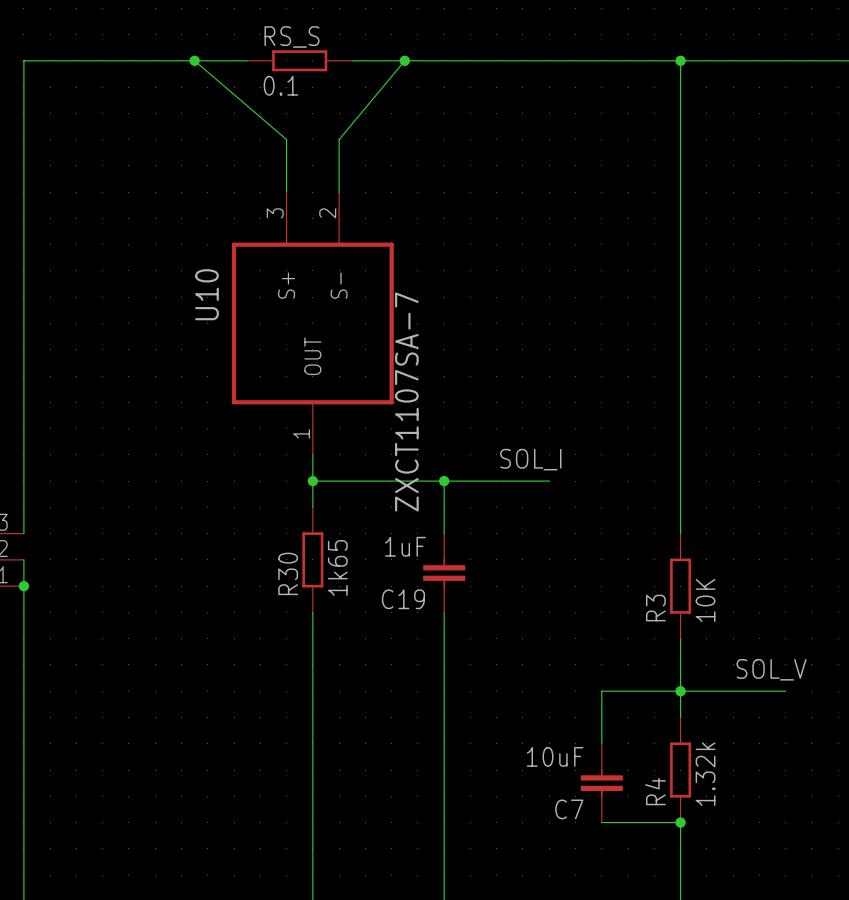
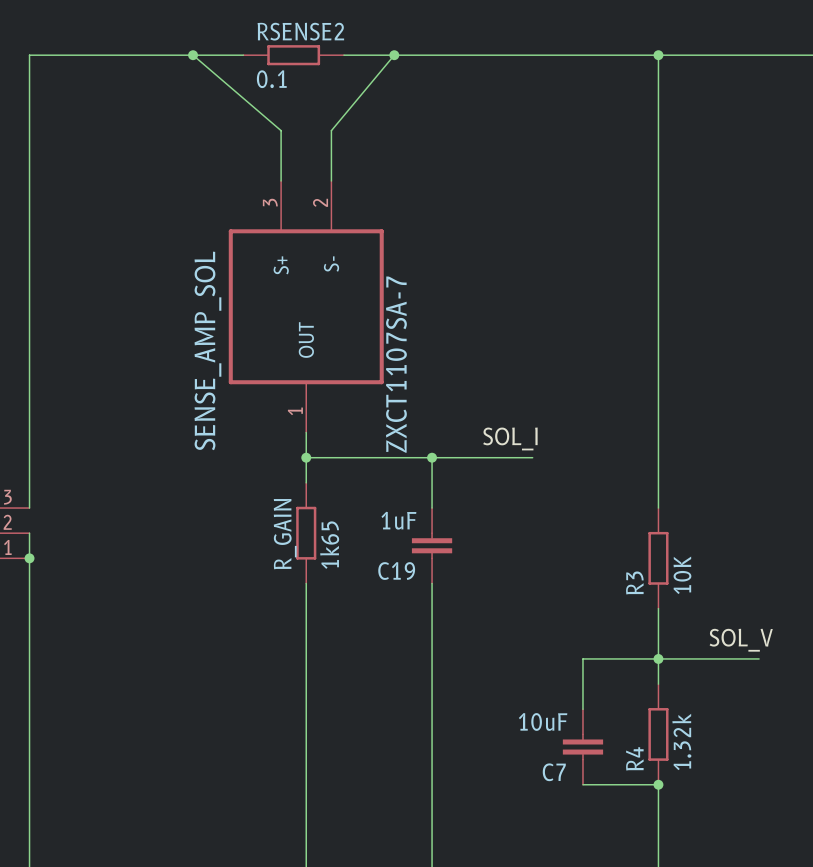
RS_S name: RS_S (292, 36) -> RSENSE2 (300, 31)
U10 name: U10 (206, 294) -> SENSE_AMP_SOL (207, 350)
R30 name: R30 (288, 573) -> R_GAIN (285, 534)

